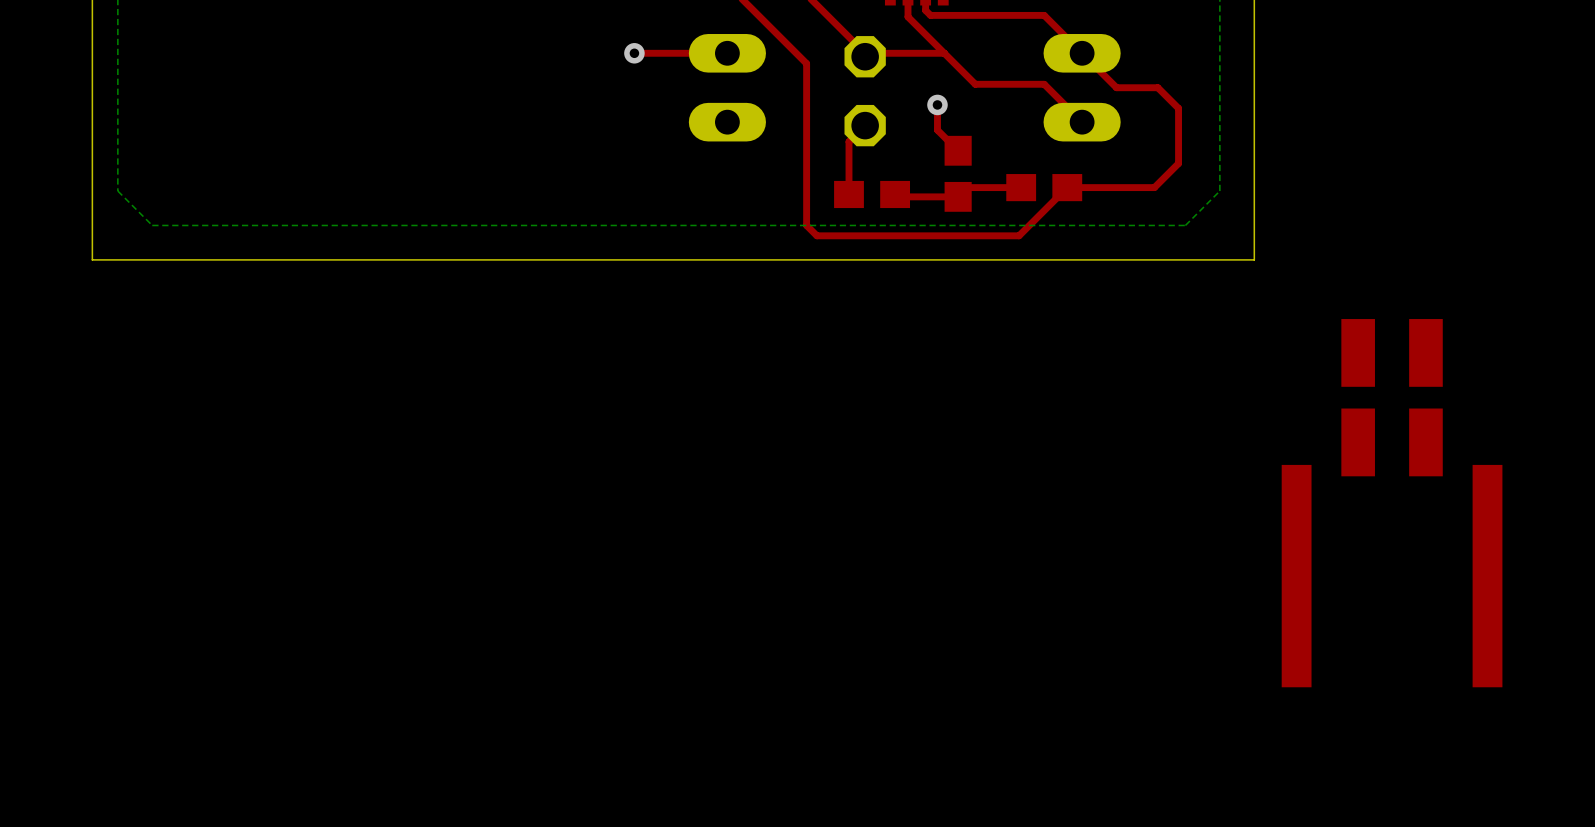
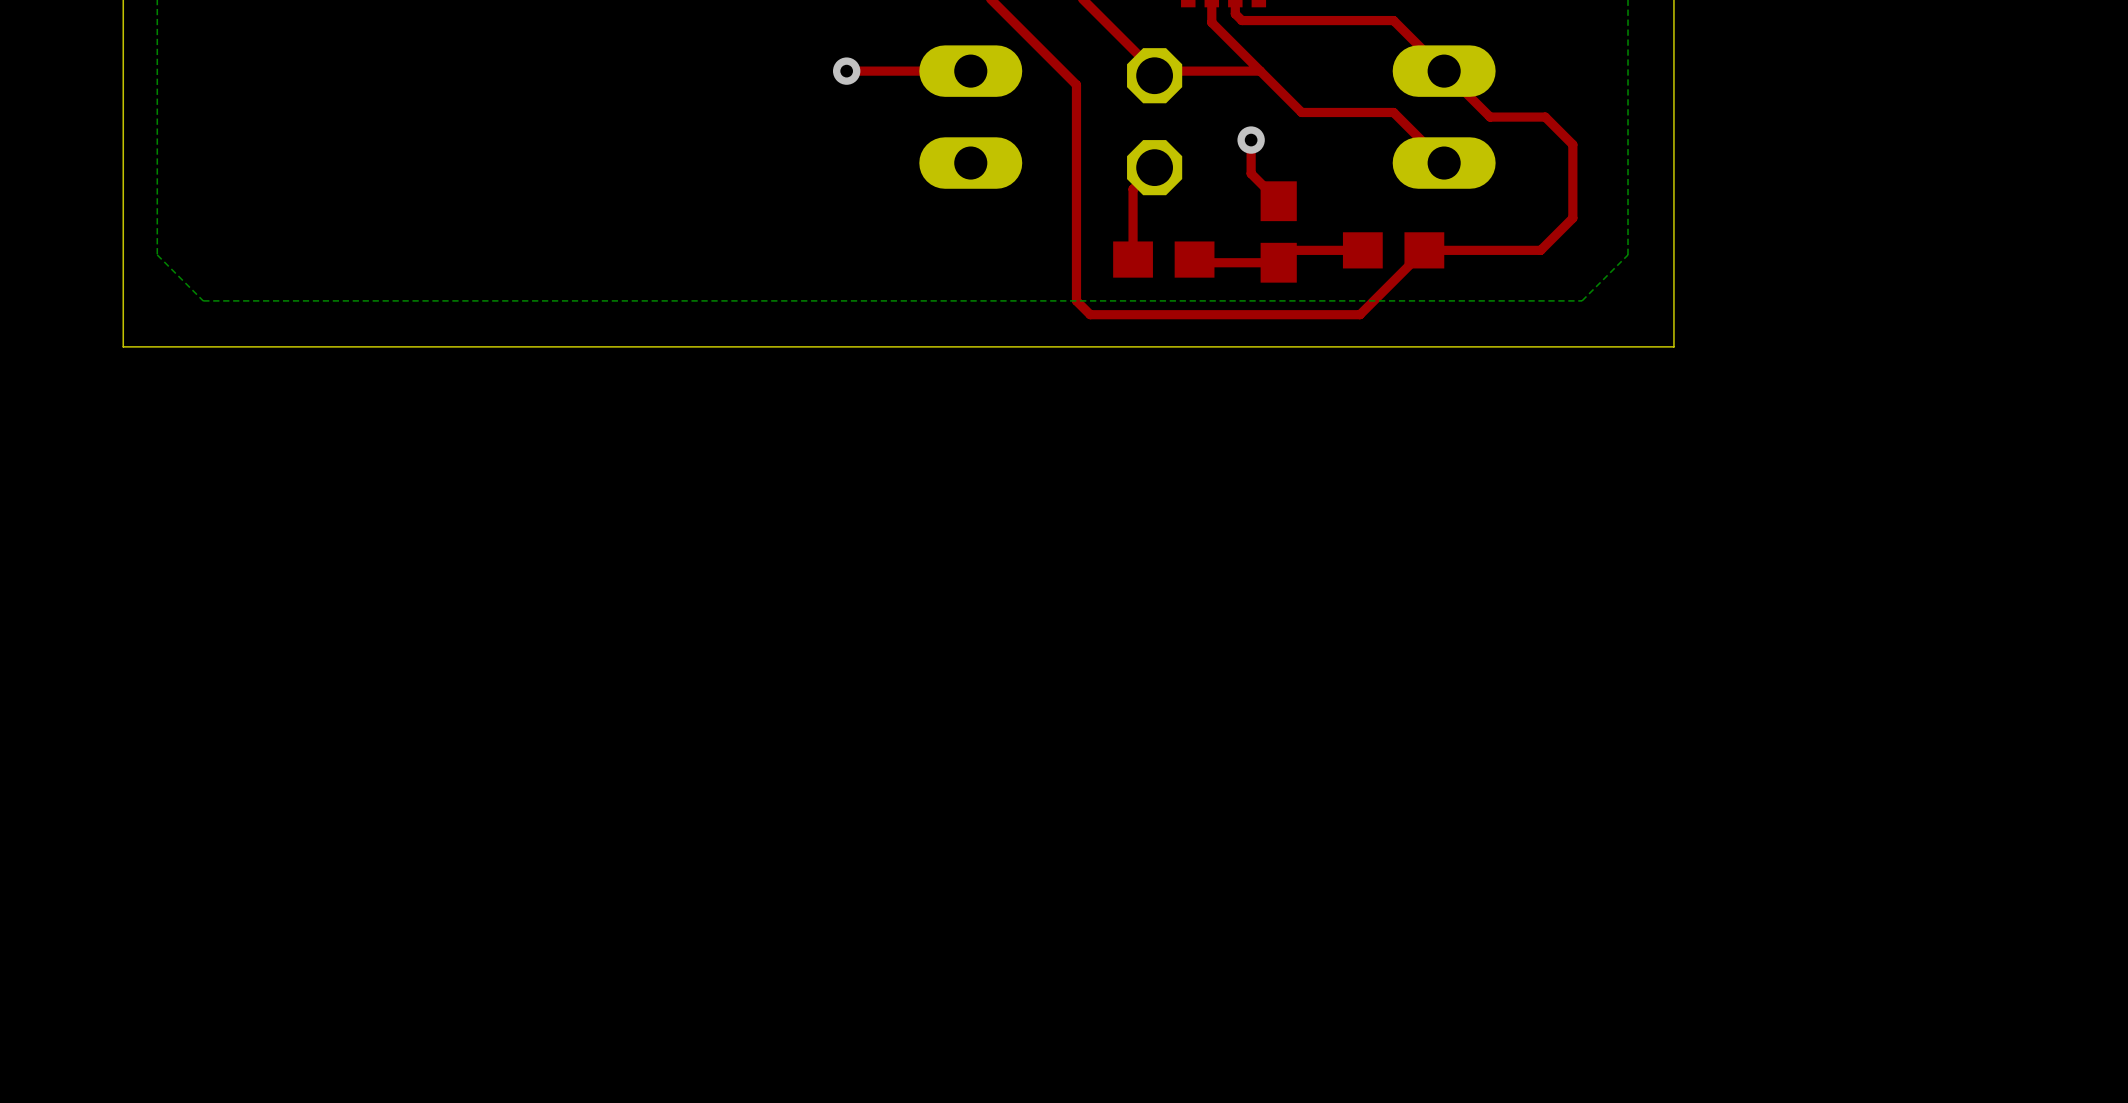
part: (1392, 503) -> none

